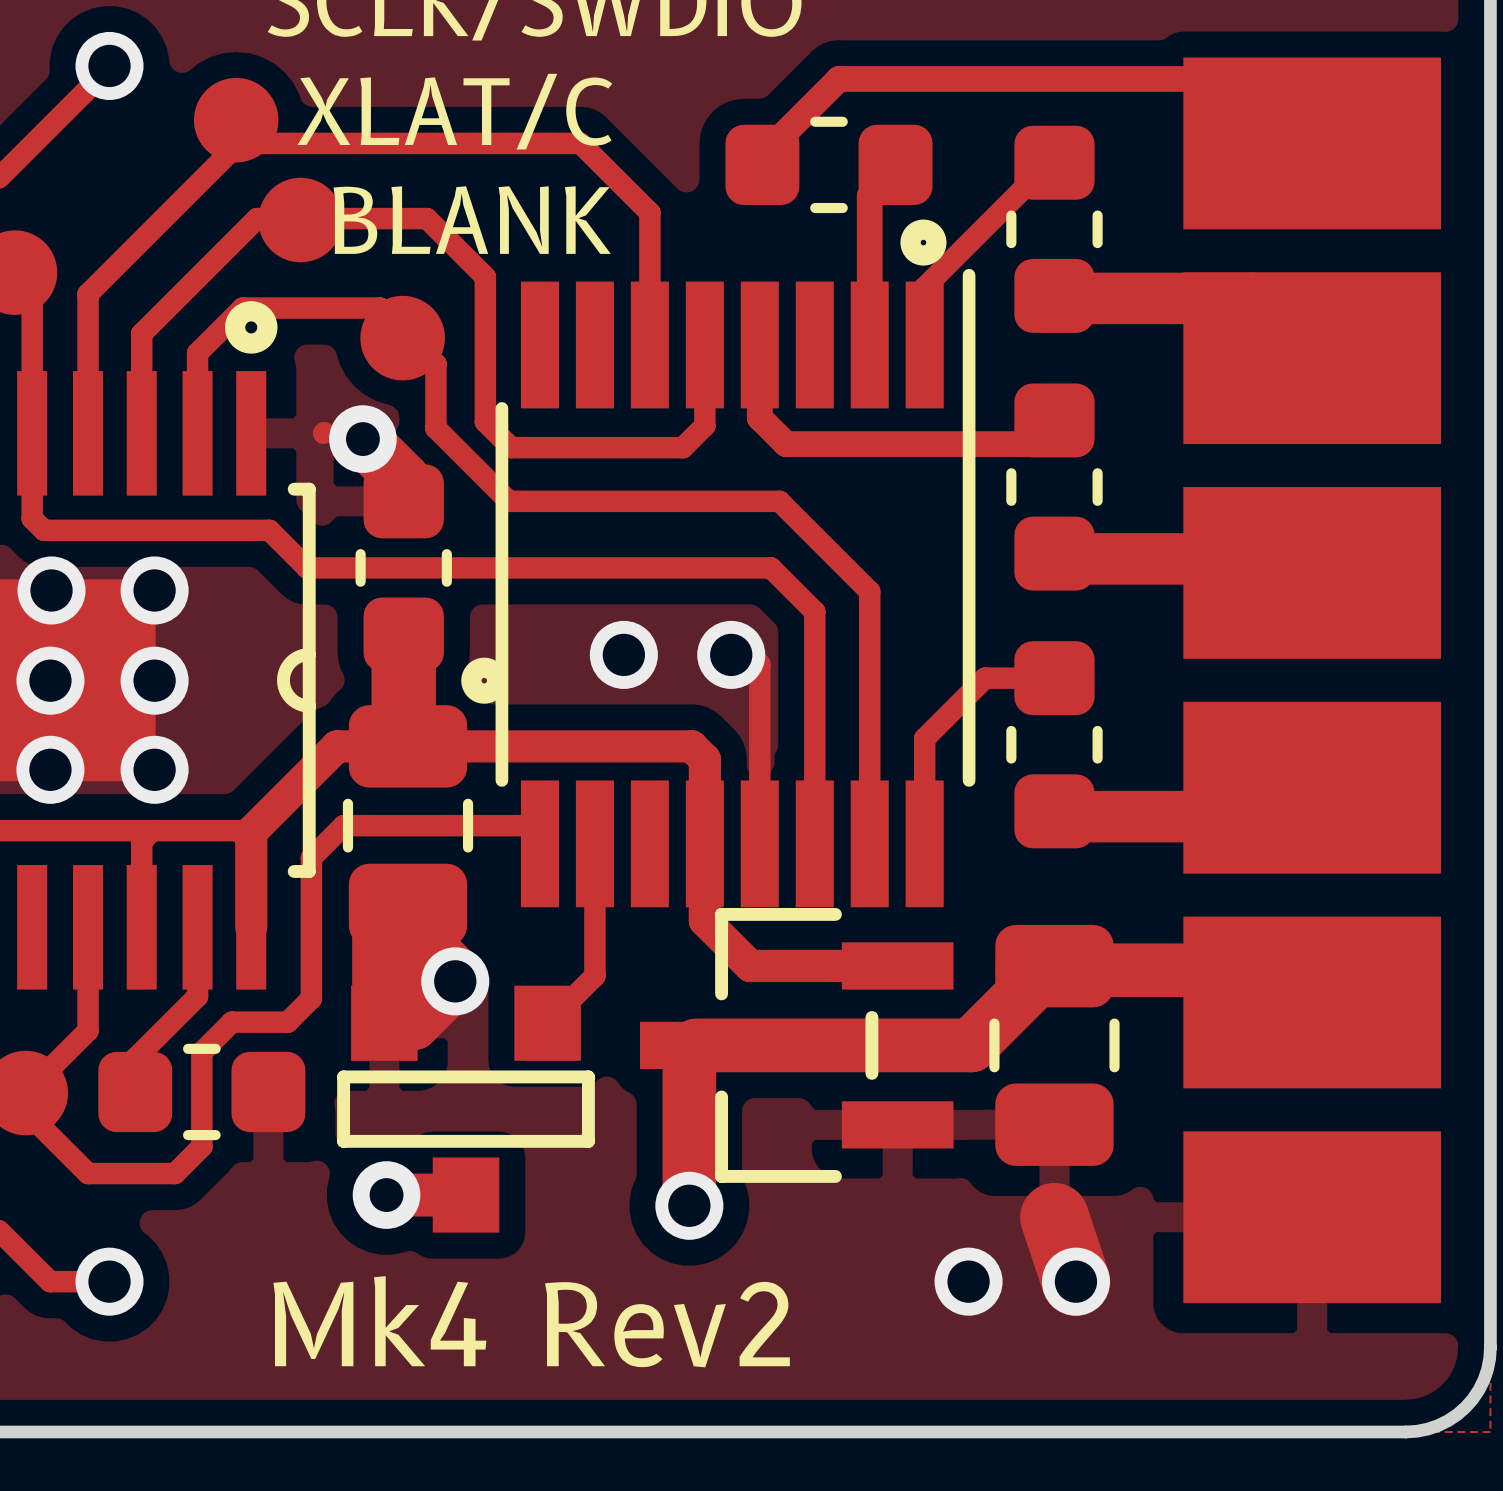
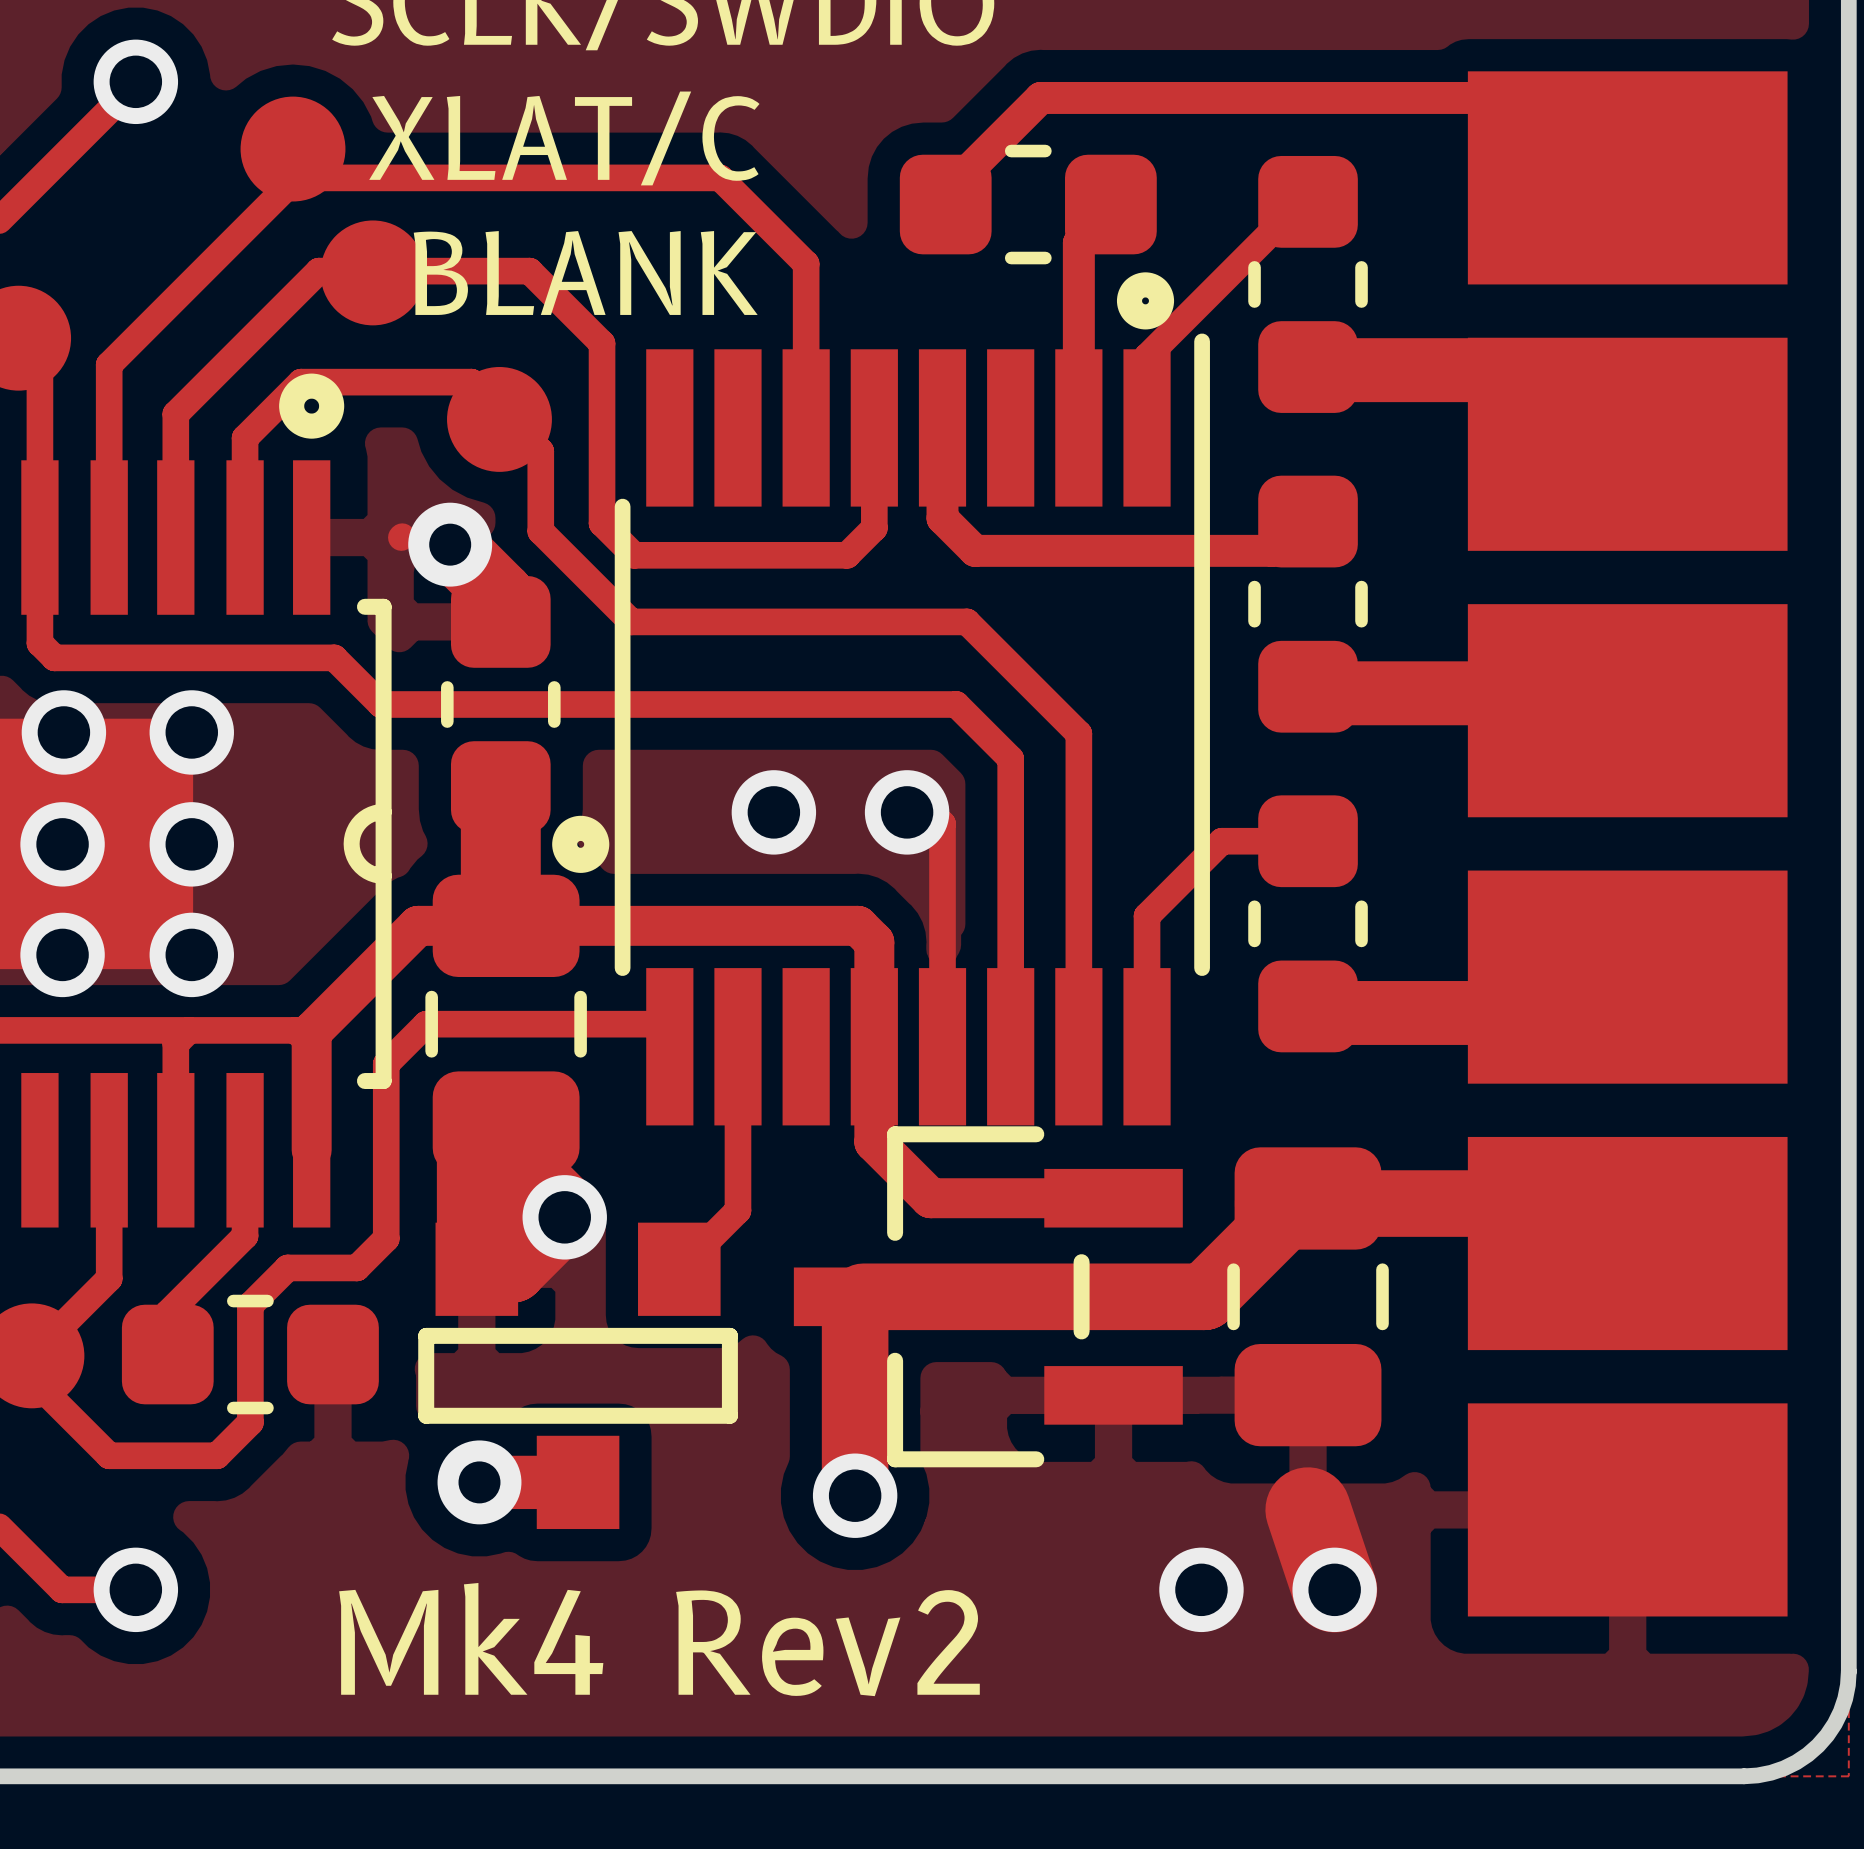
drawing position: (484, 680) -> (580, 844)

